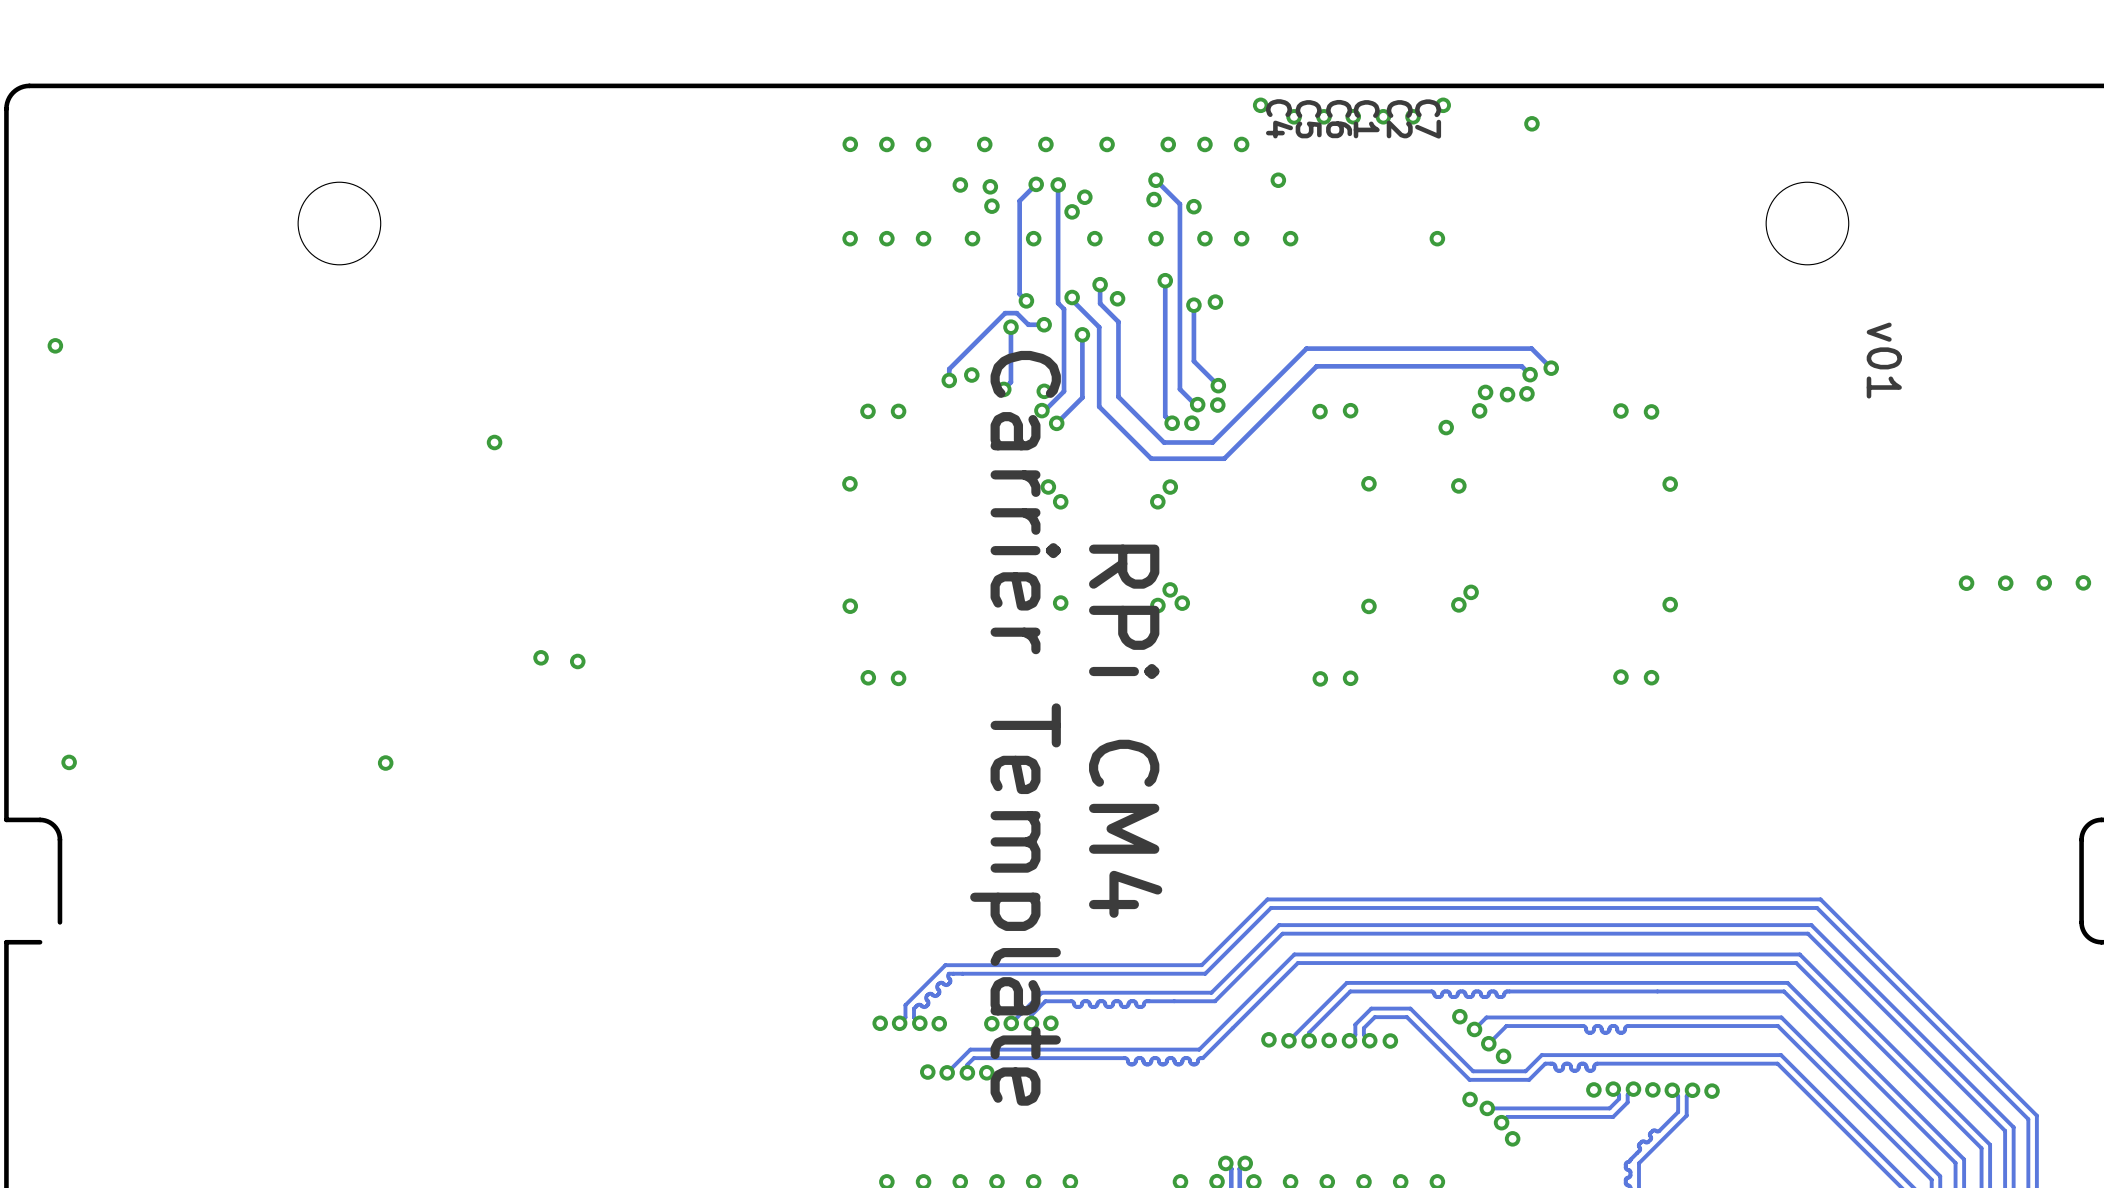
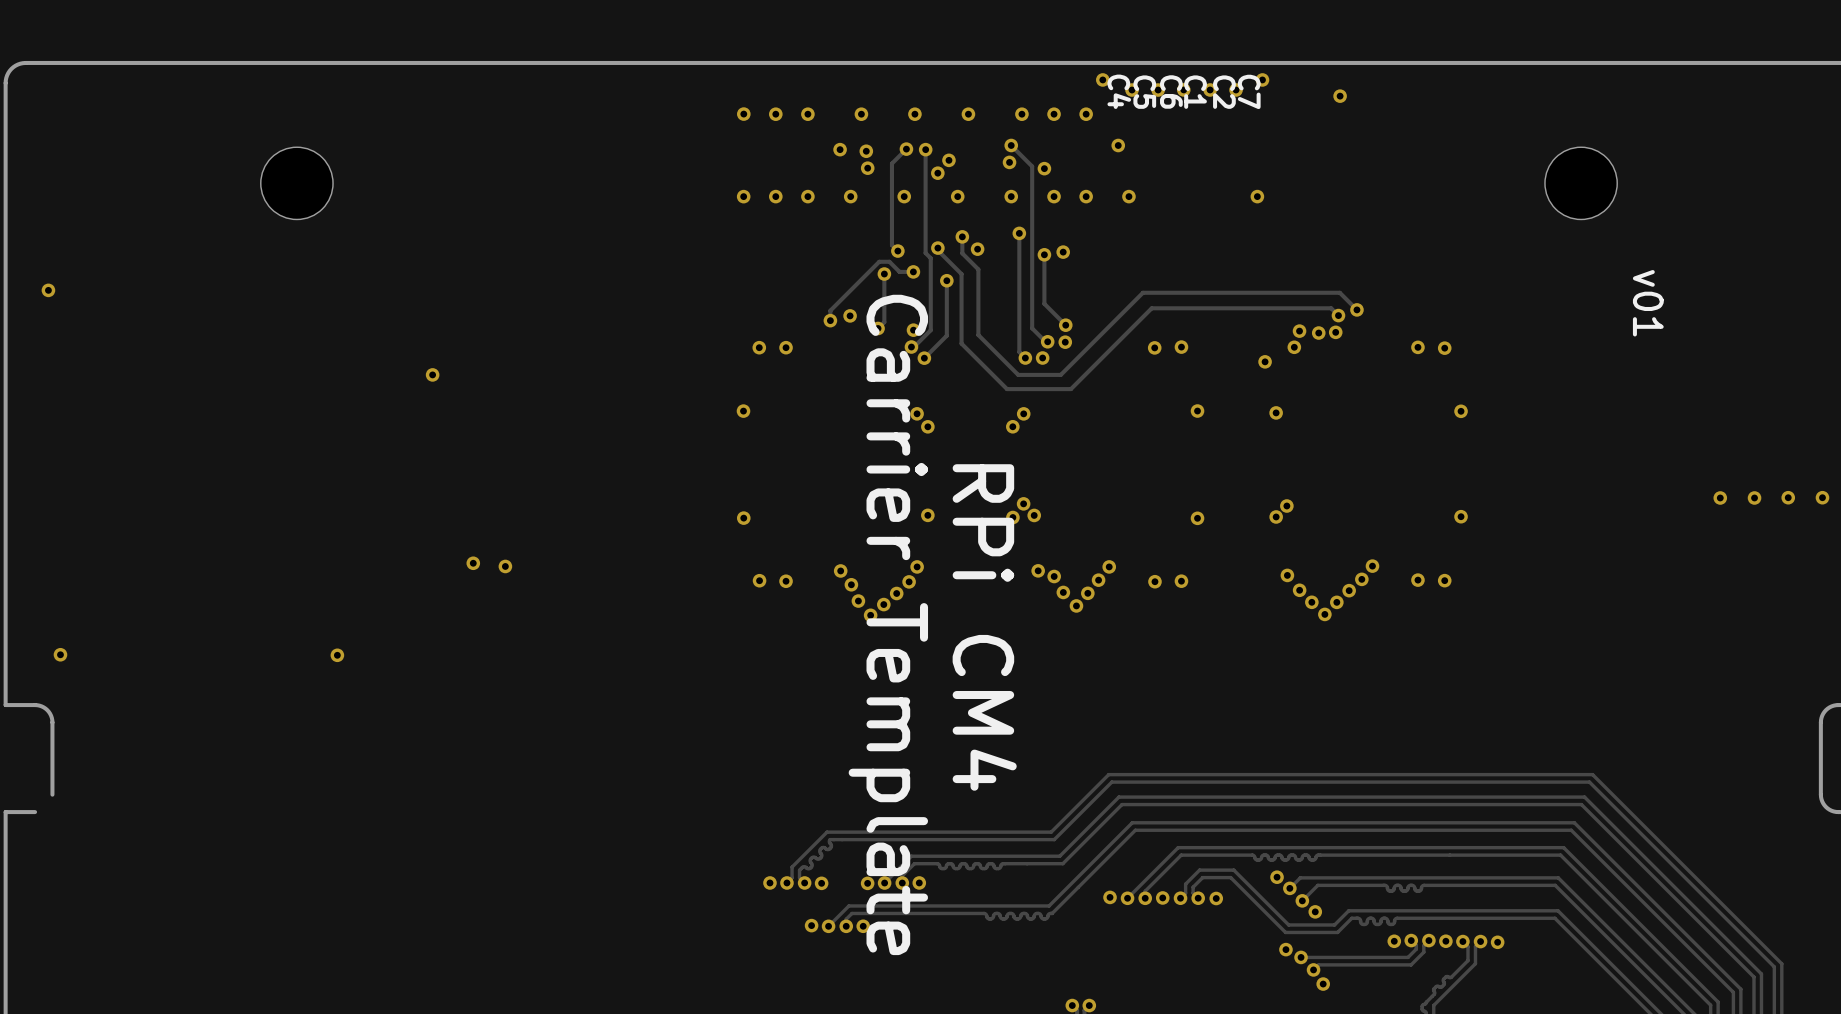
via: none -> (917, 566)
via: none -> (1109, 566)
via: none -> (1372, 566)
via: none -> (840, 570)
via: none -> (1038, 570)
via: none -> (1287, 575)
via: none -> (1054, 576)
via: none -> (1361, 579)
via: none -> (1098, 580)
via: none -> (909, 581)
via: none -> (851, 584)
via: none -> (1299, 590)
via: none -> (1349, 590)
via: none -> (1063, 592)
via: none -> (896, 593)
via: none -> (1087, 593)
via: none -> (858, 601)
via: none -> (1311, 602)
via: none -> (1336, 602)
via: none -> (883, 604)
via: none -> (1076, 605)
via: none -> (1324, 614)
via: none -> (870, 615)

